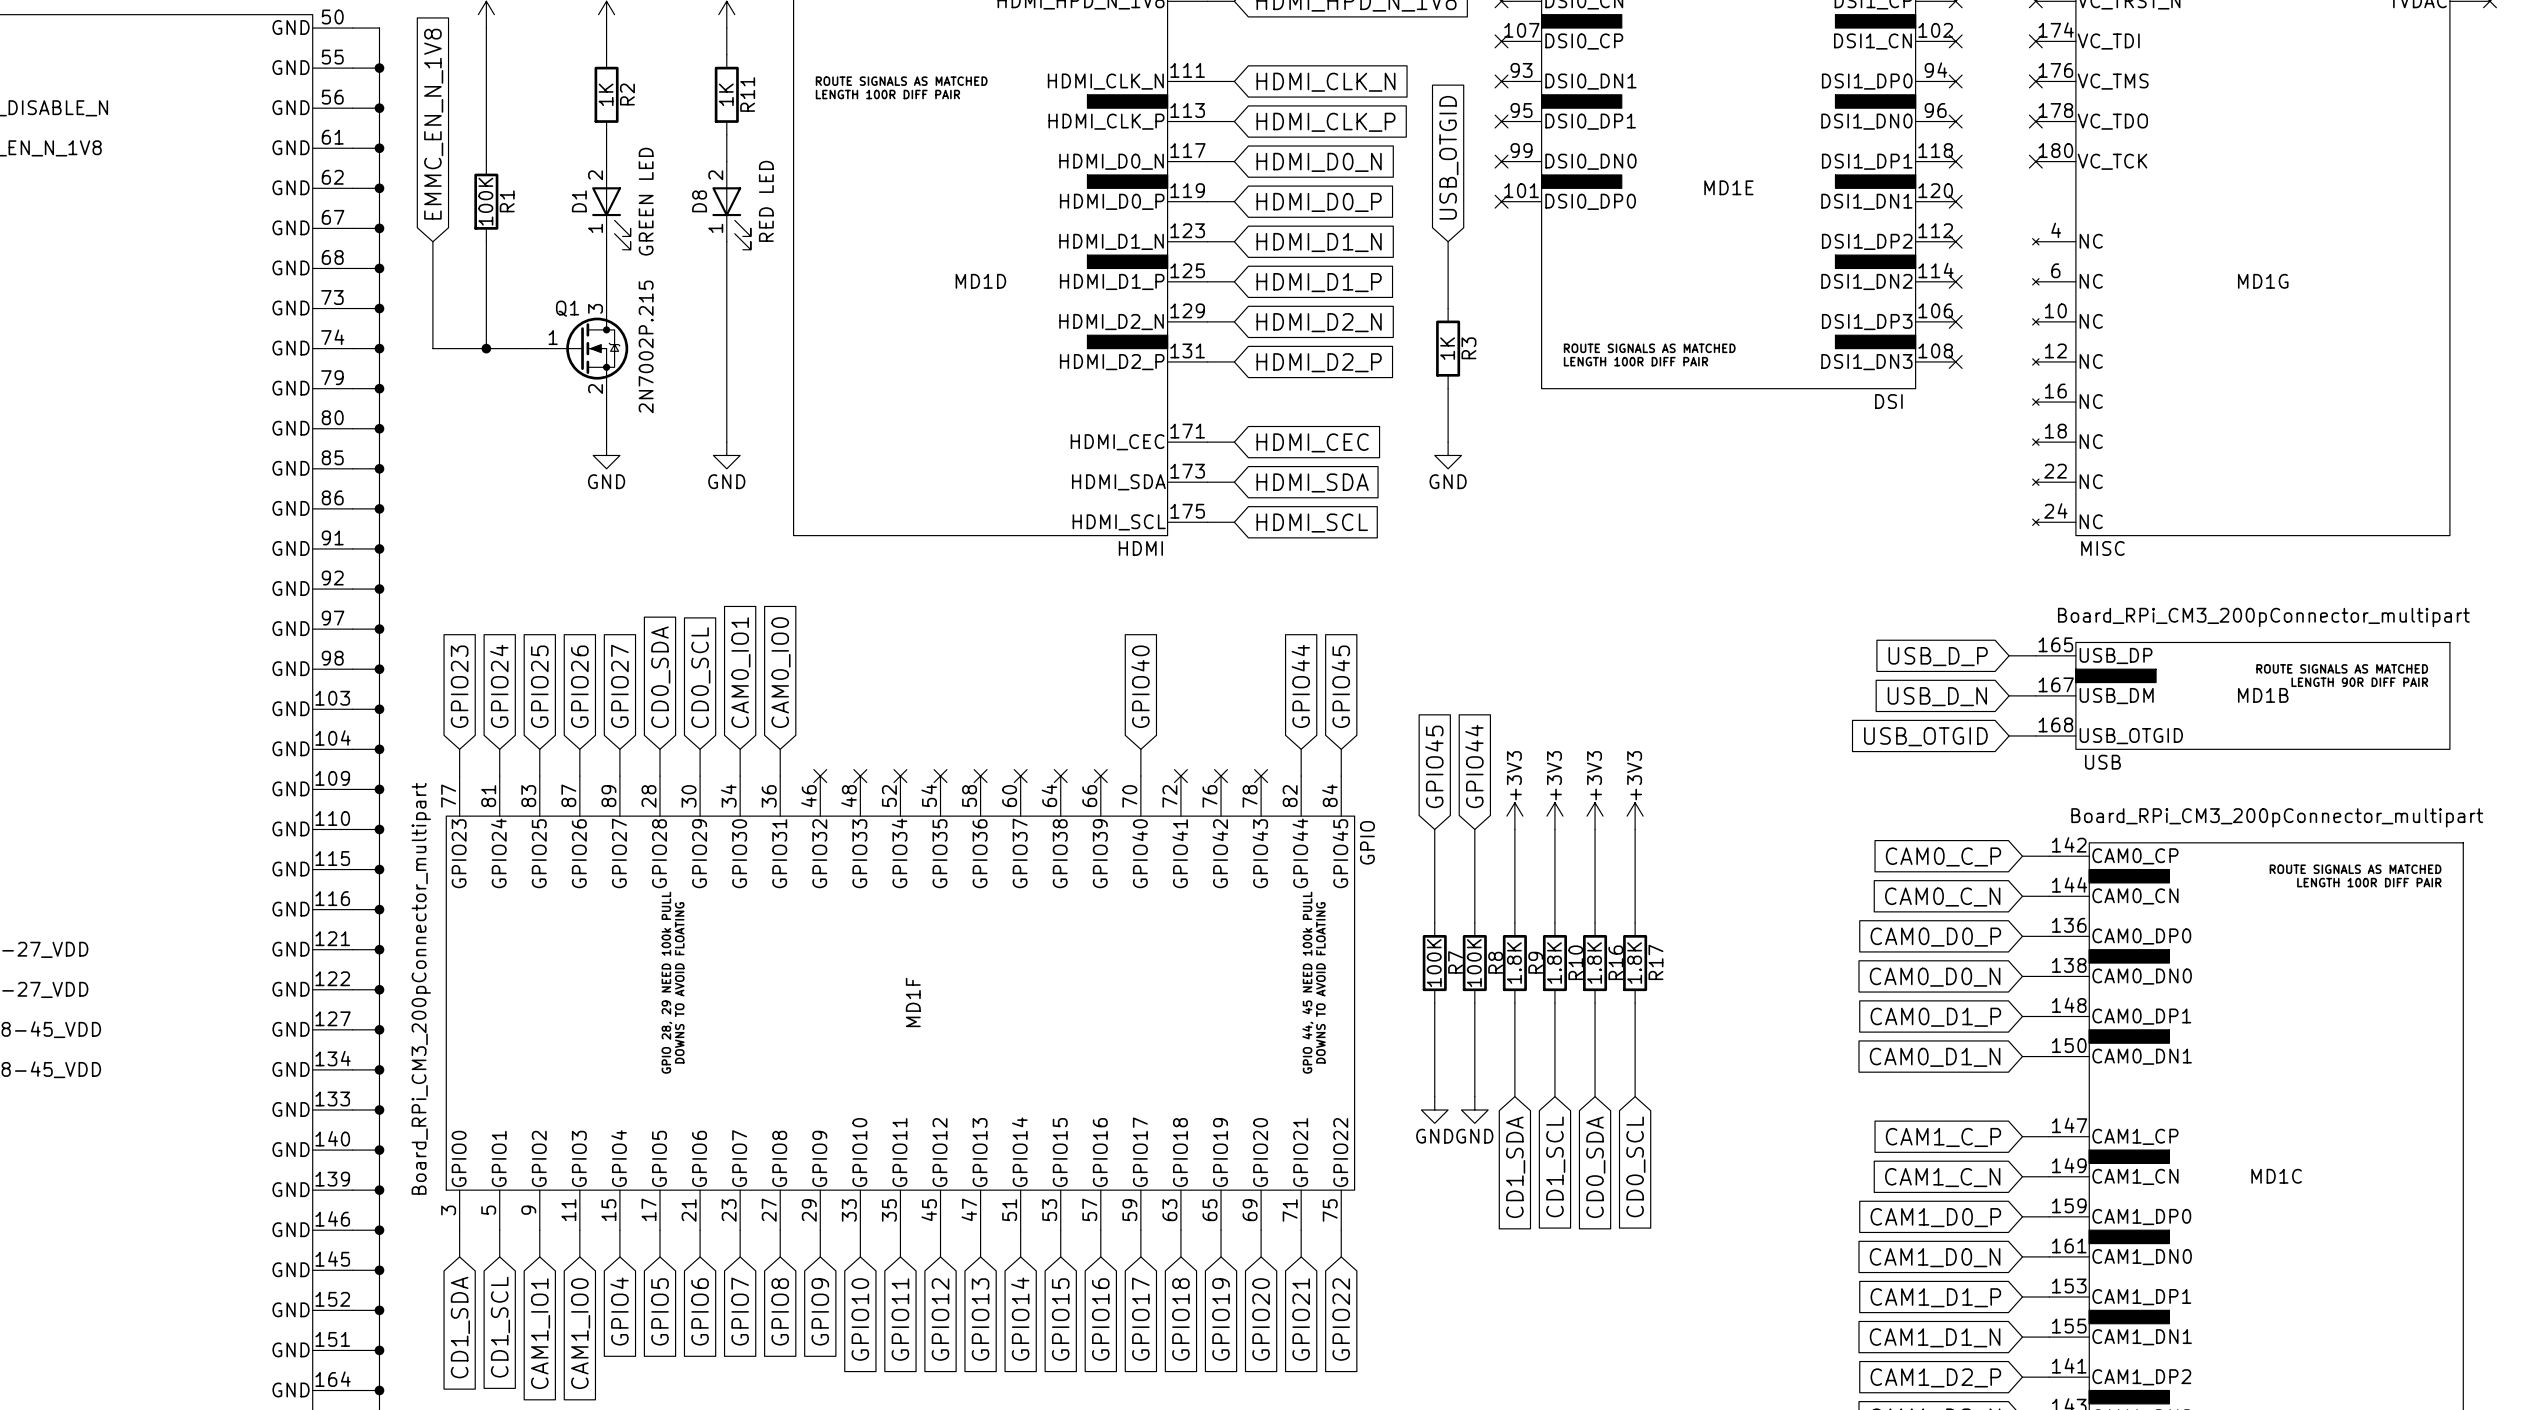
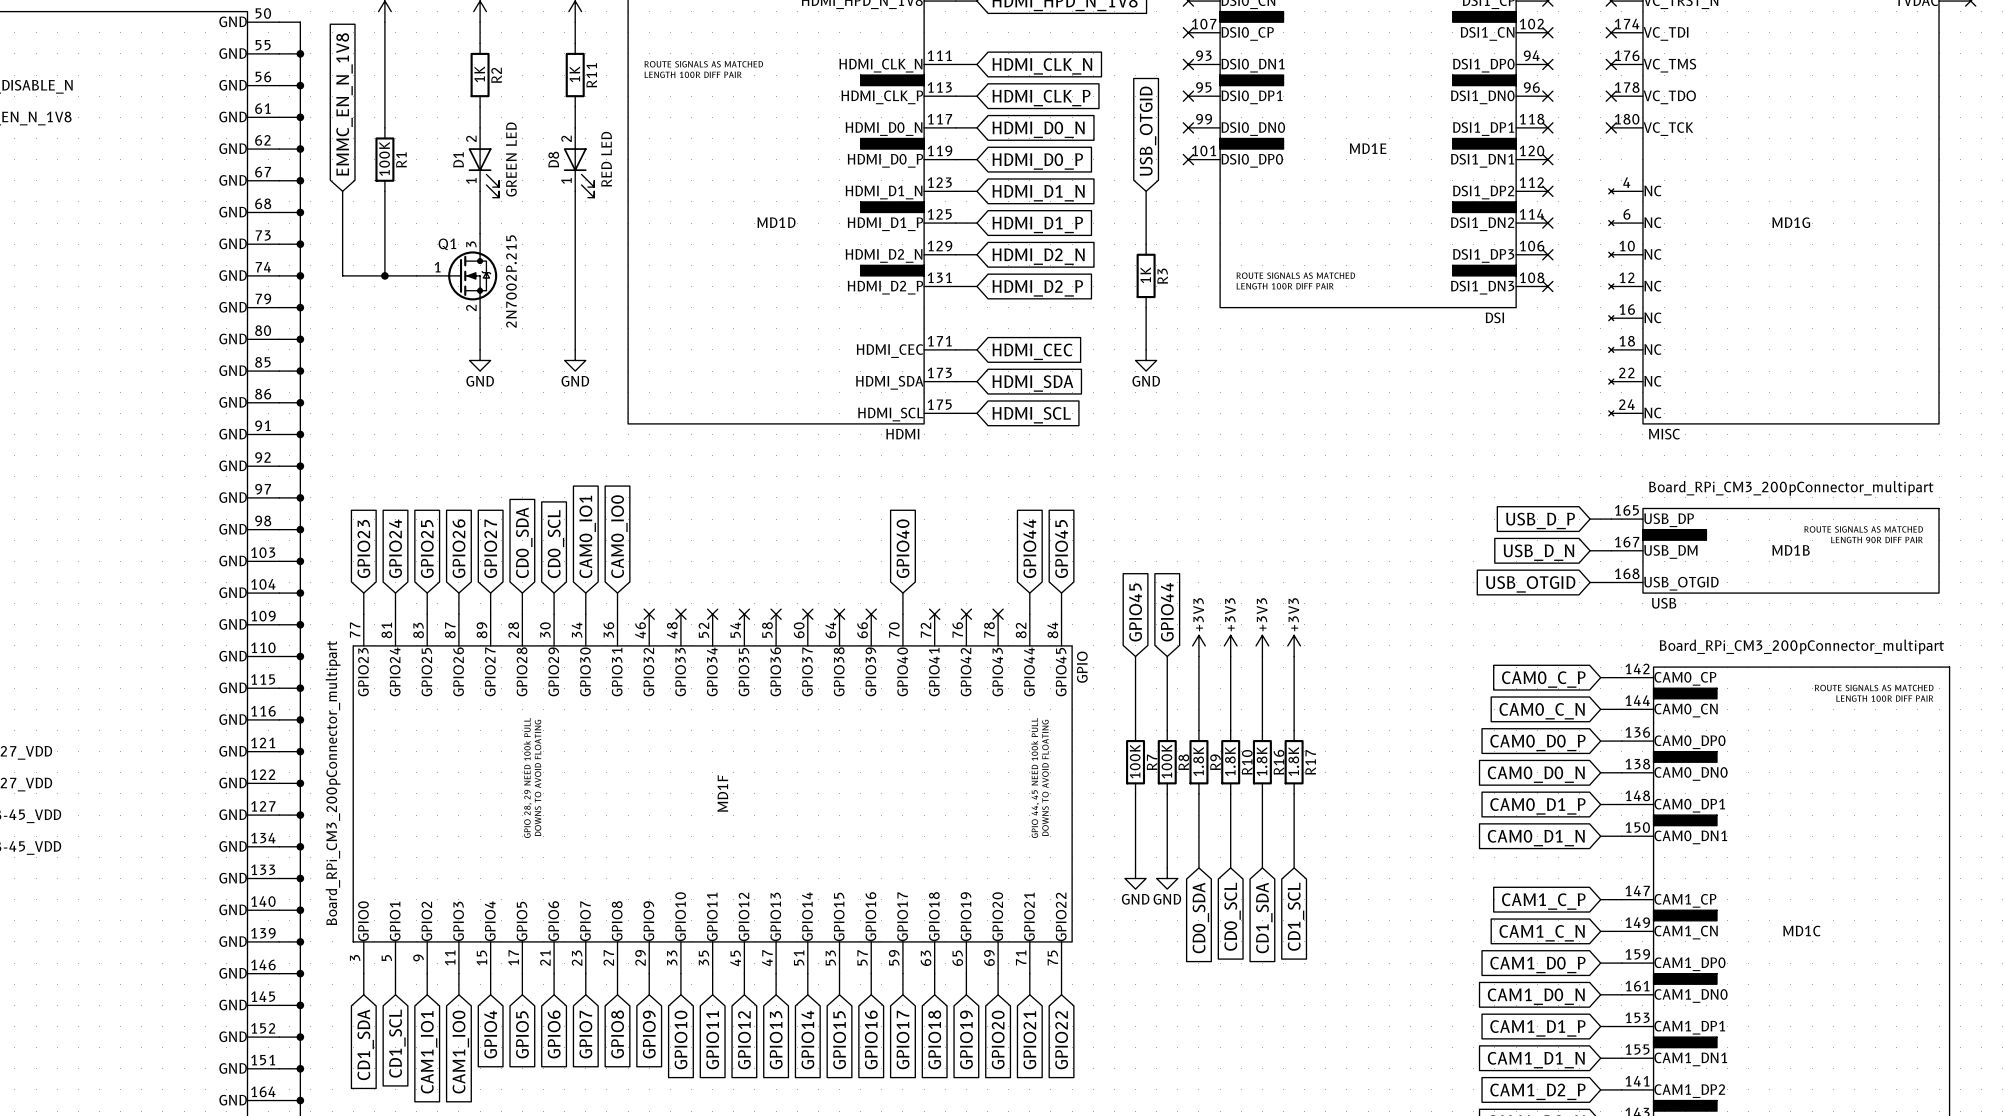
global label: CD1_SCL (1555, 1166) -> CD0_SCL (1232, 916)
global label: CD0_SCL (1635, 1166) -> CD1_SCL (1296, 916)
global label: CD1_SDA (1515, 1167) -> CD0_SDA (1200, 918)
global label: CD0_SDA (1595, 1167) -> CD1_SDA (1264, 918)

